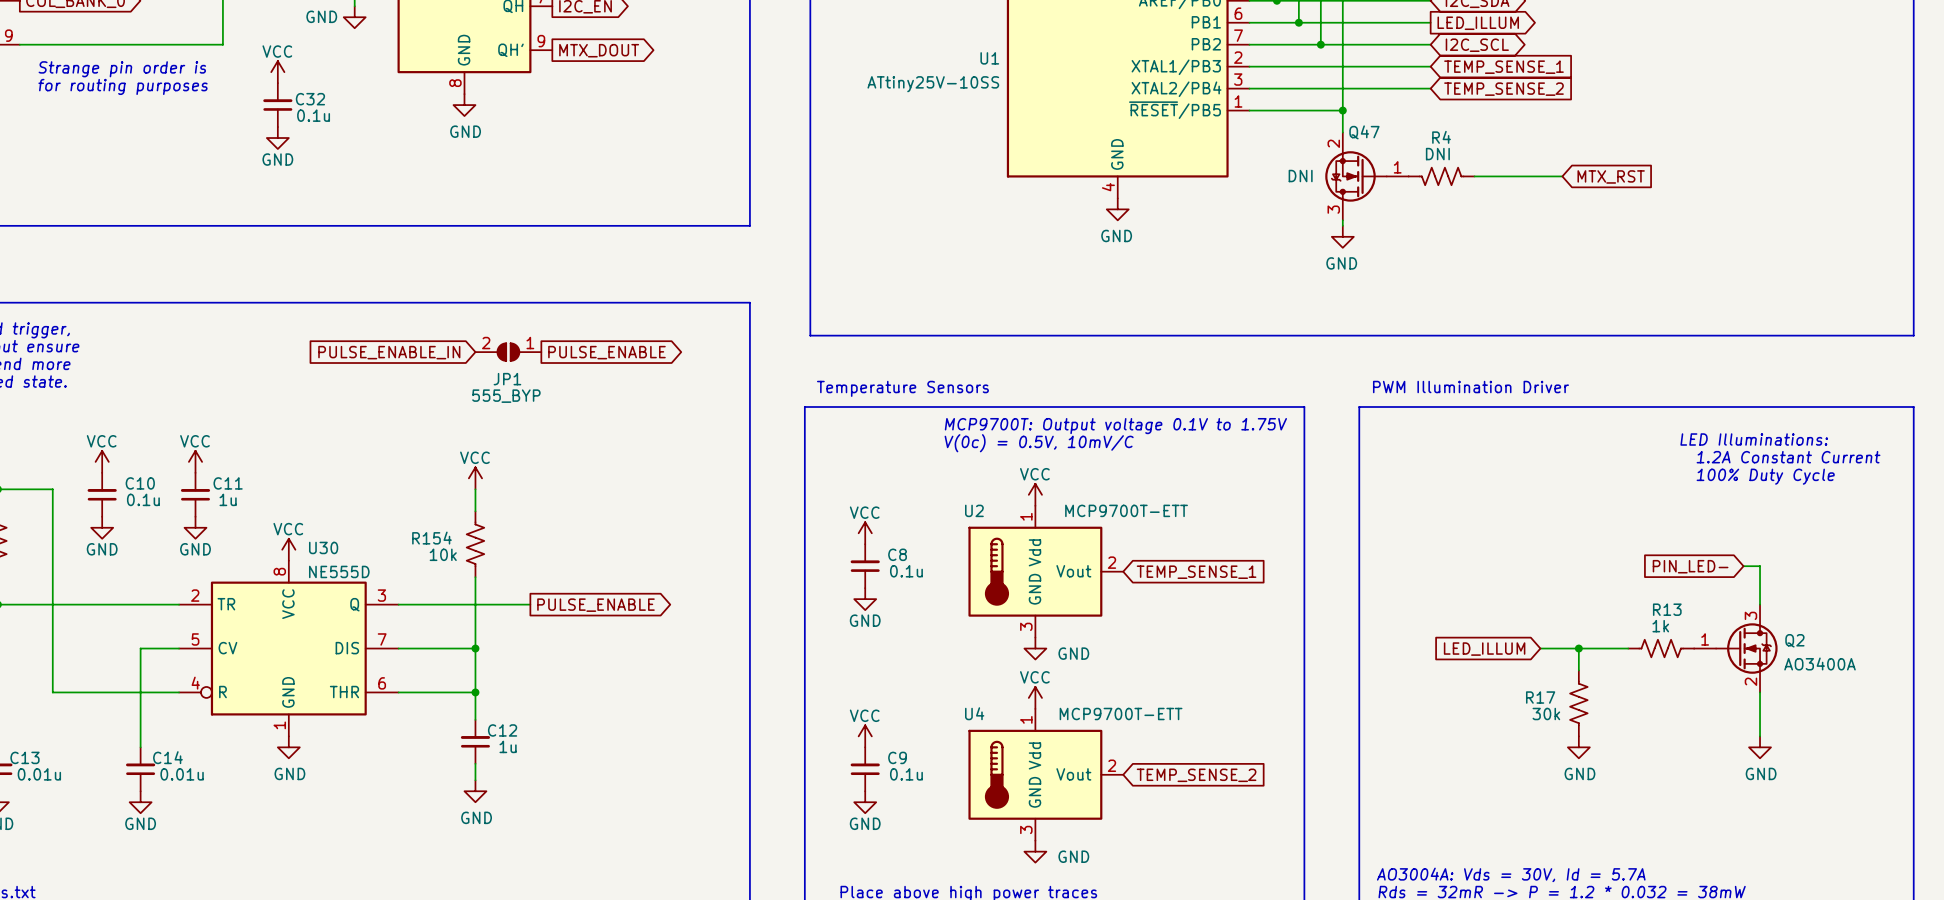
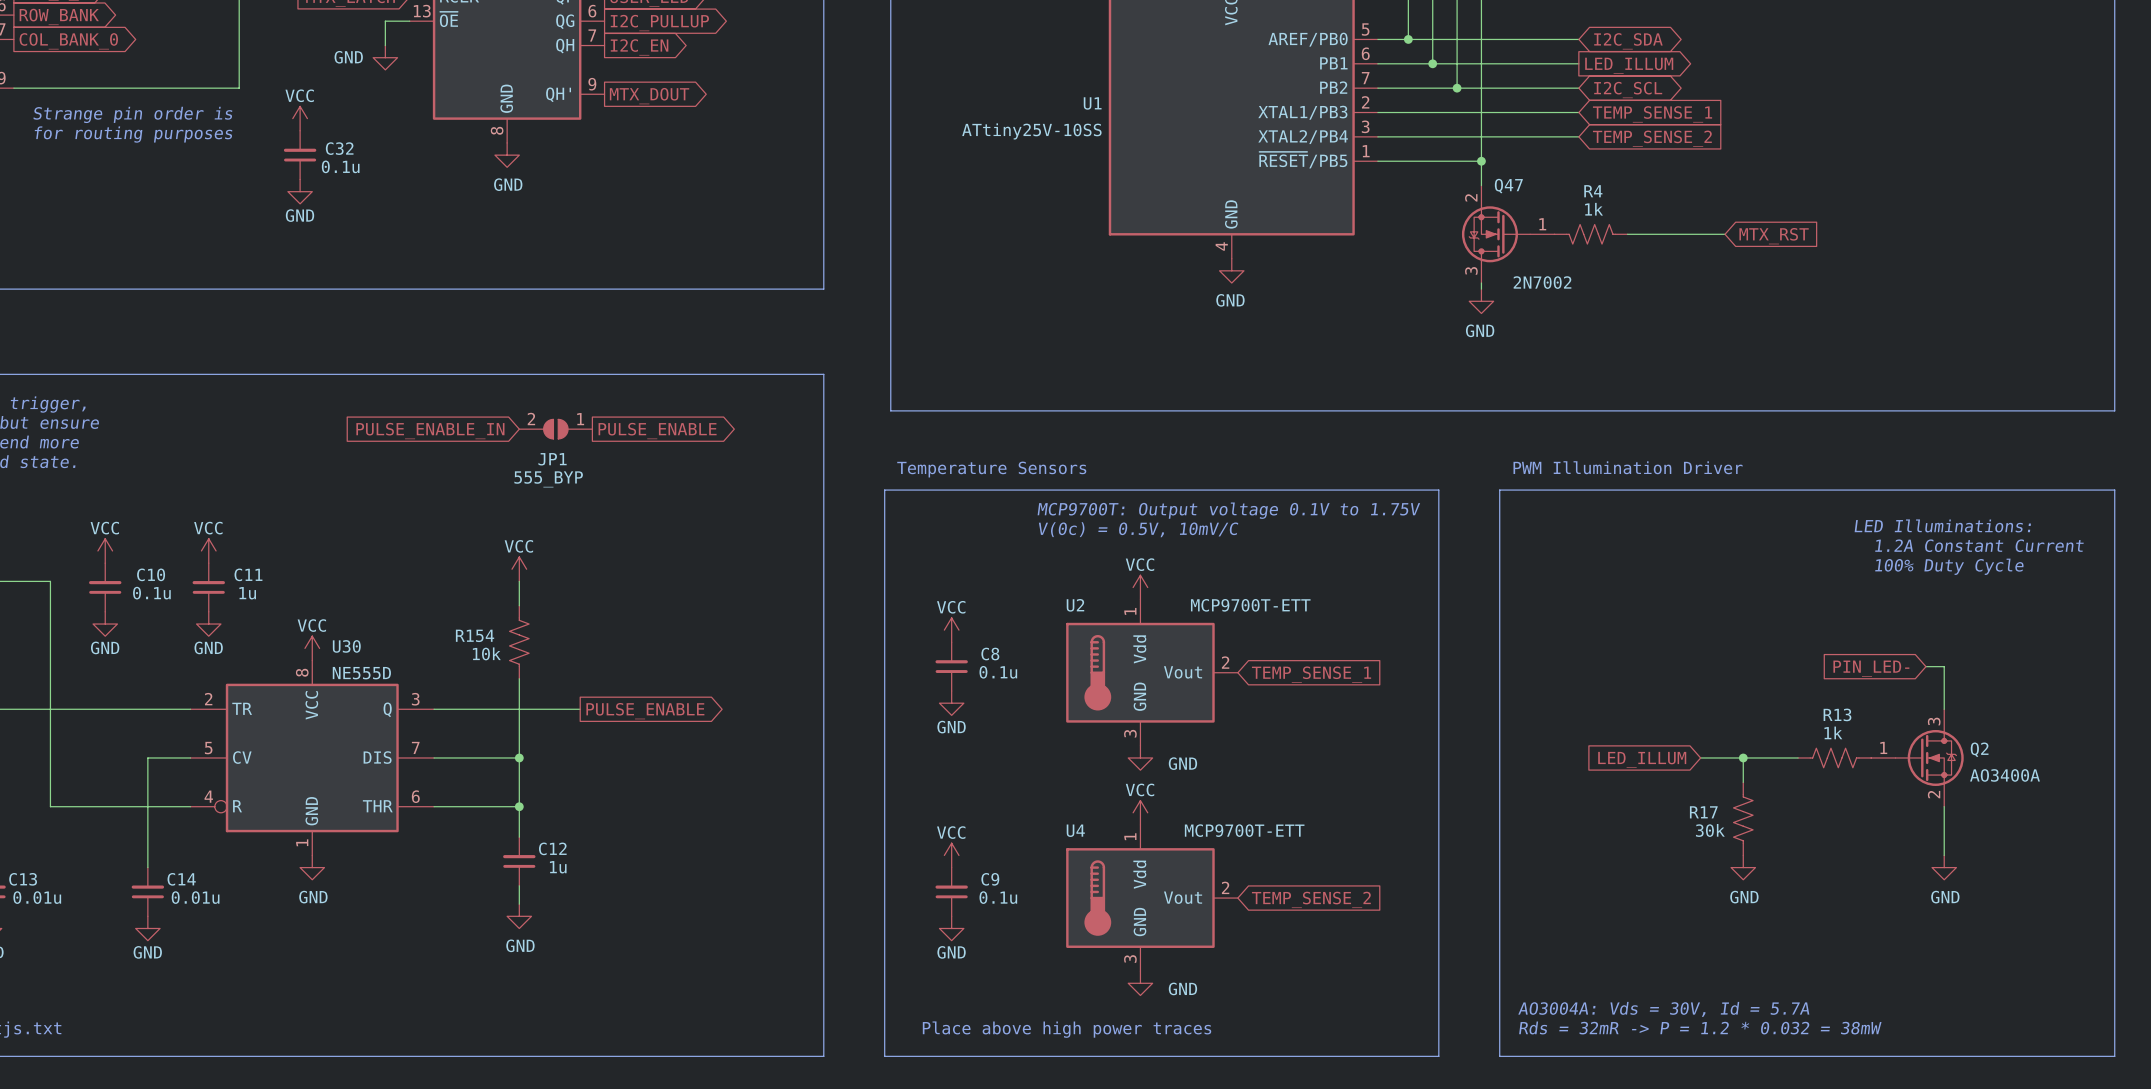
R4 value: DNI (1437, 154) -> 1k (1594, 209)
Q47 value: DNI (1300, 176) -> 2N7002 (1542, 282)

